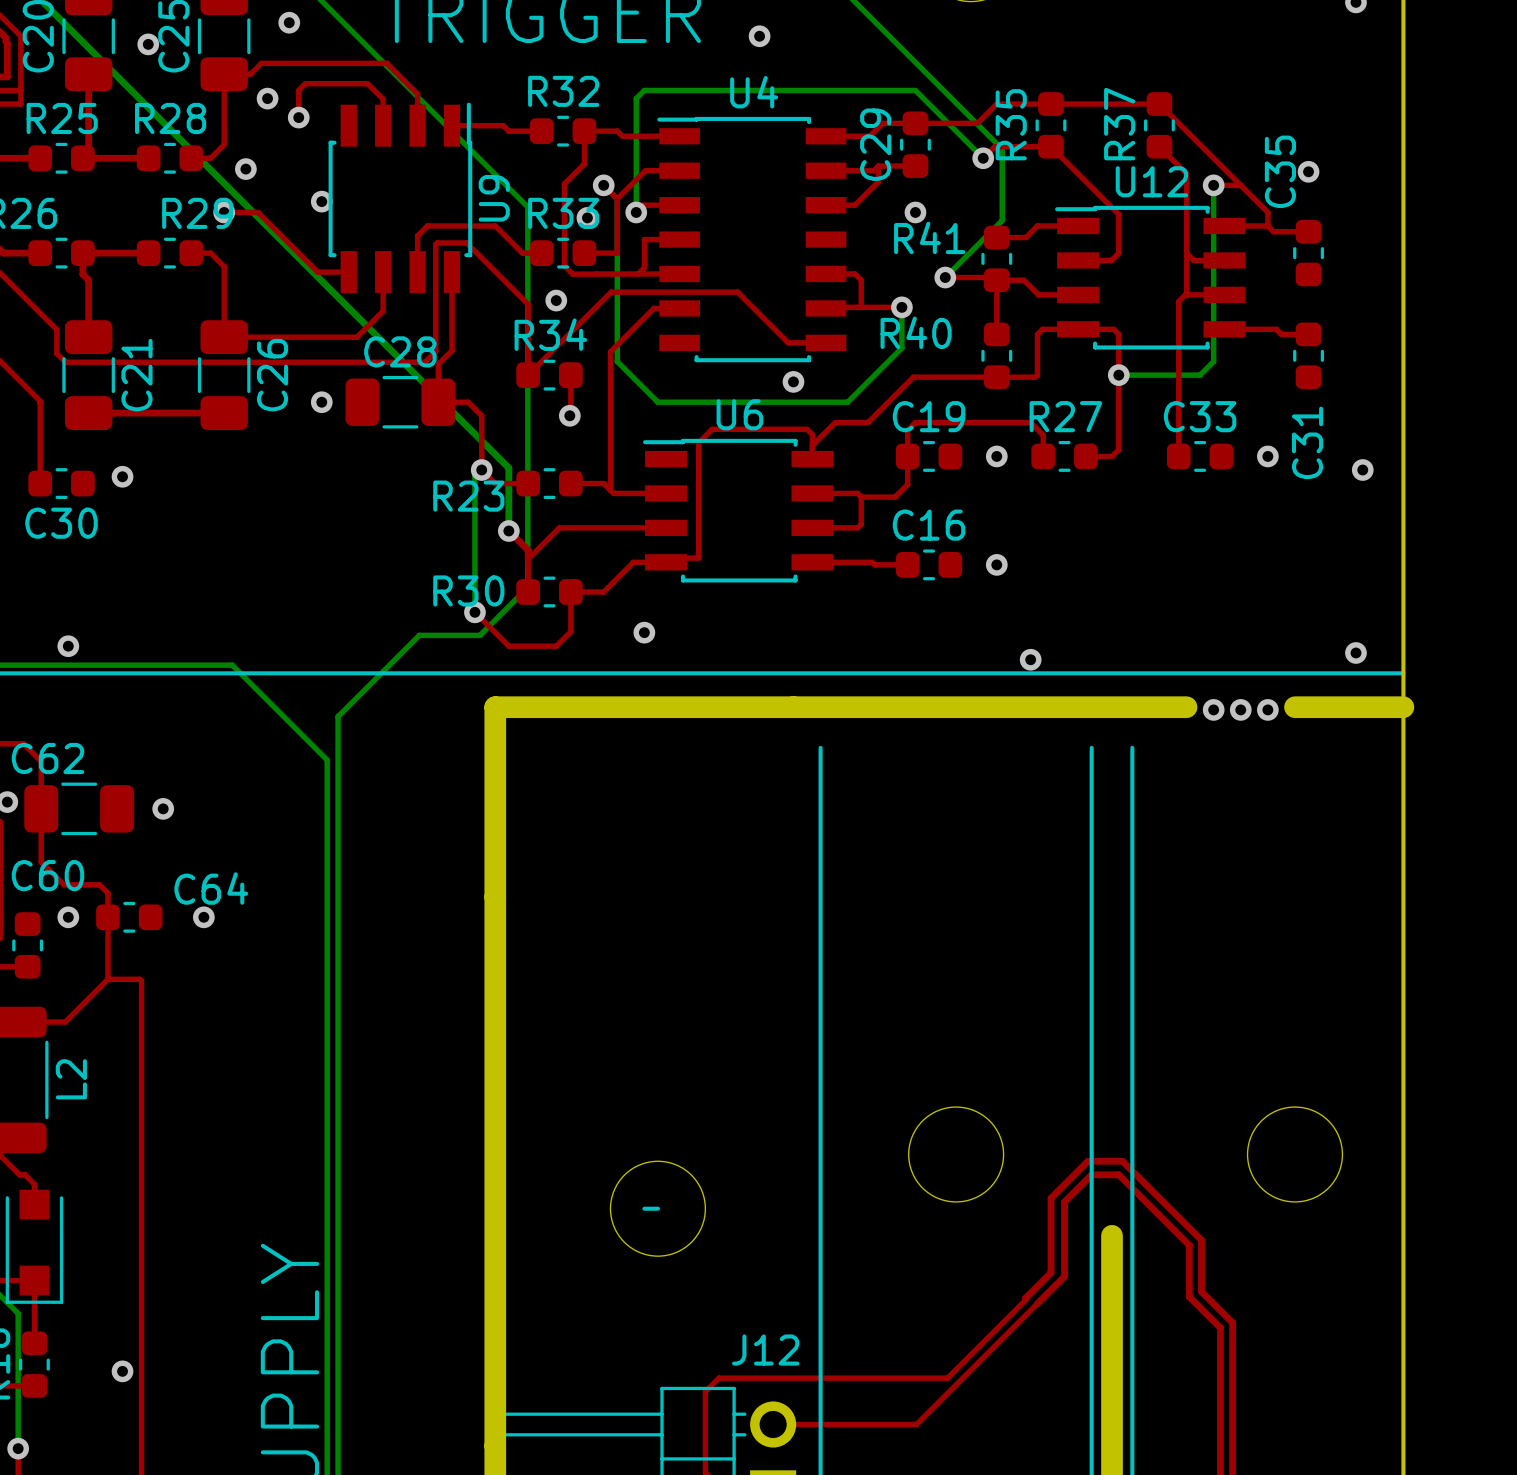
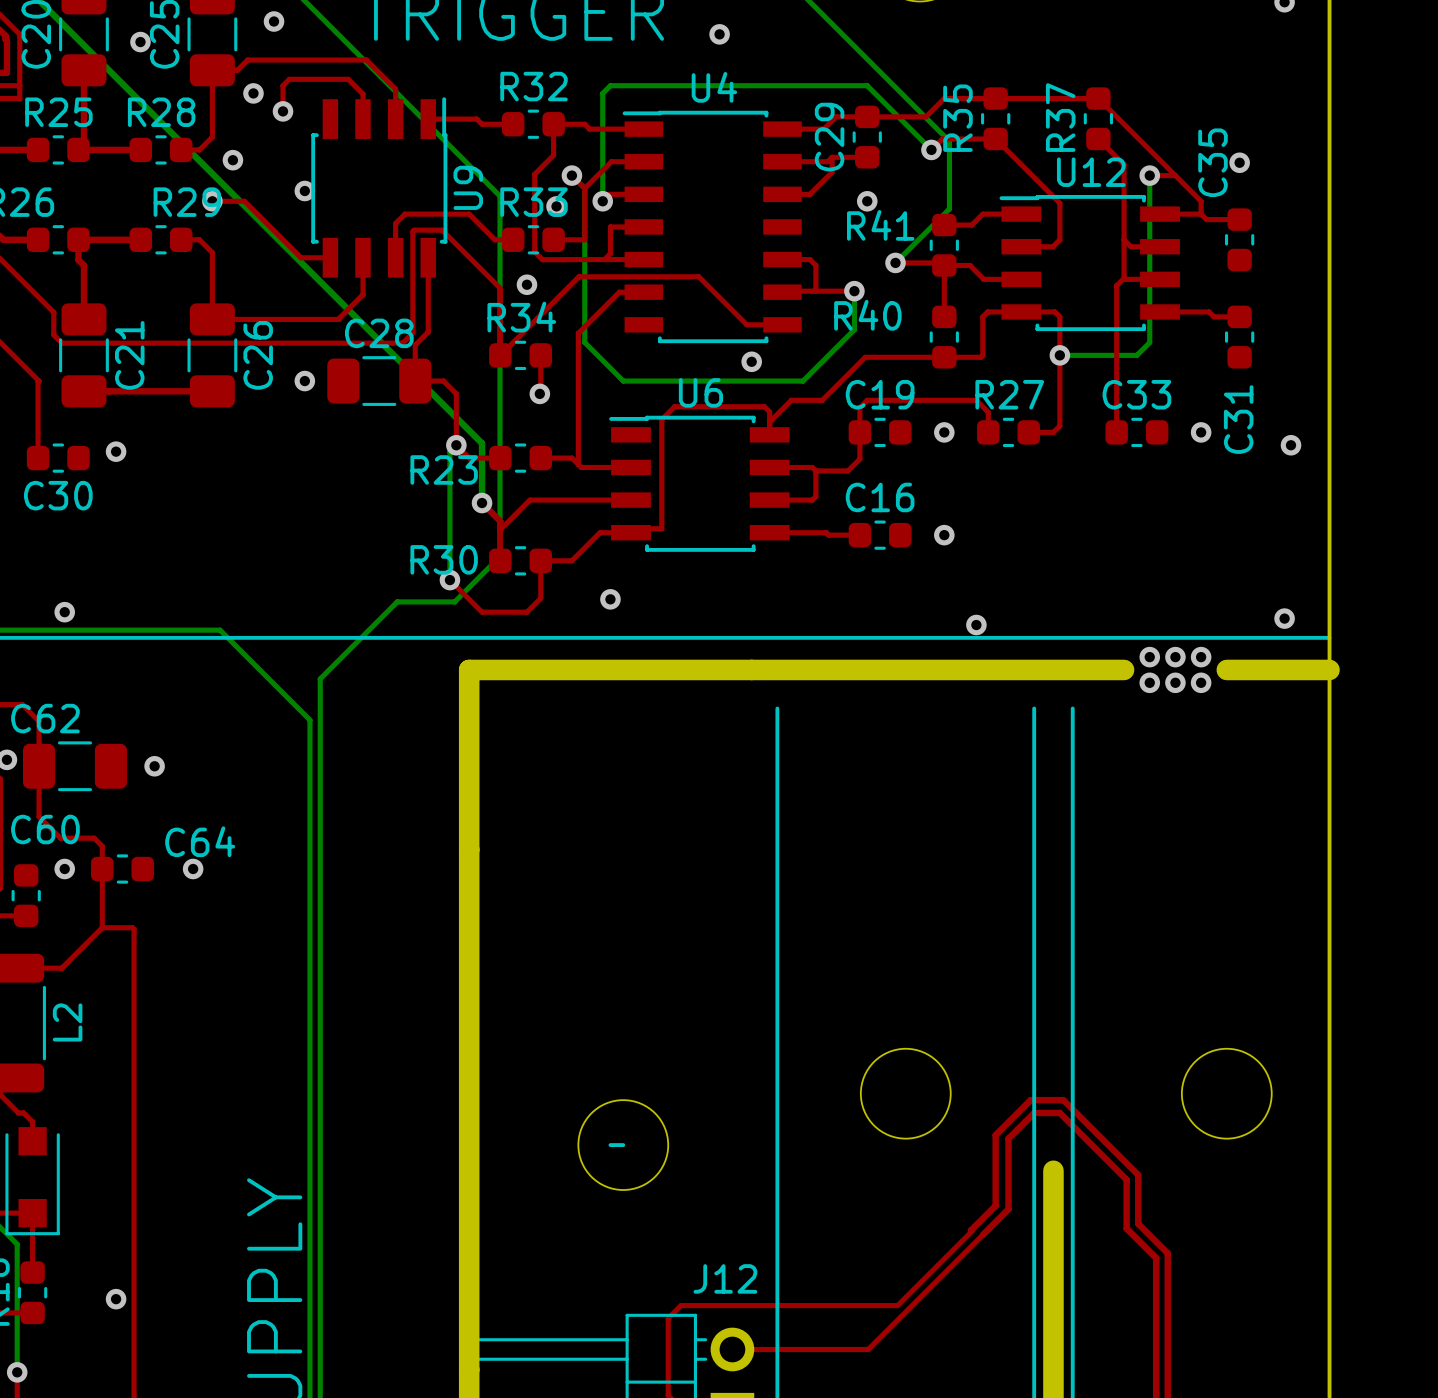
via: none -> (1149, 657)
via: none -> (1175, 657)
via: none -> (1201, 657)
via: (1213, 709) -> none
via: (1240, 709) -> none
via: (1267, 709) -> none
via: none -> (1149, 682)
via: none -> (1175, 682)
via: none -> (1201, 682)

